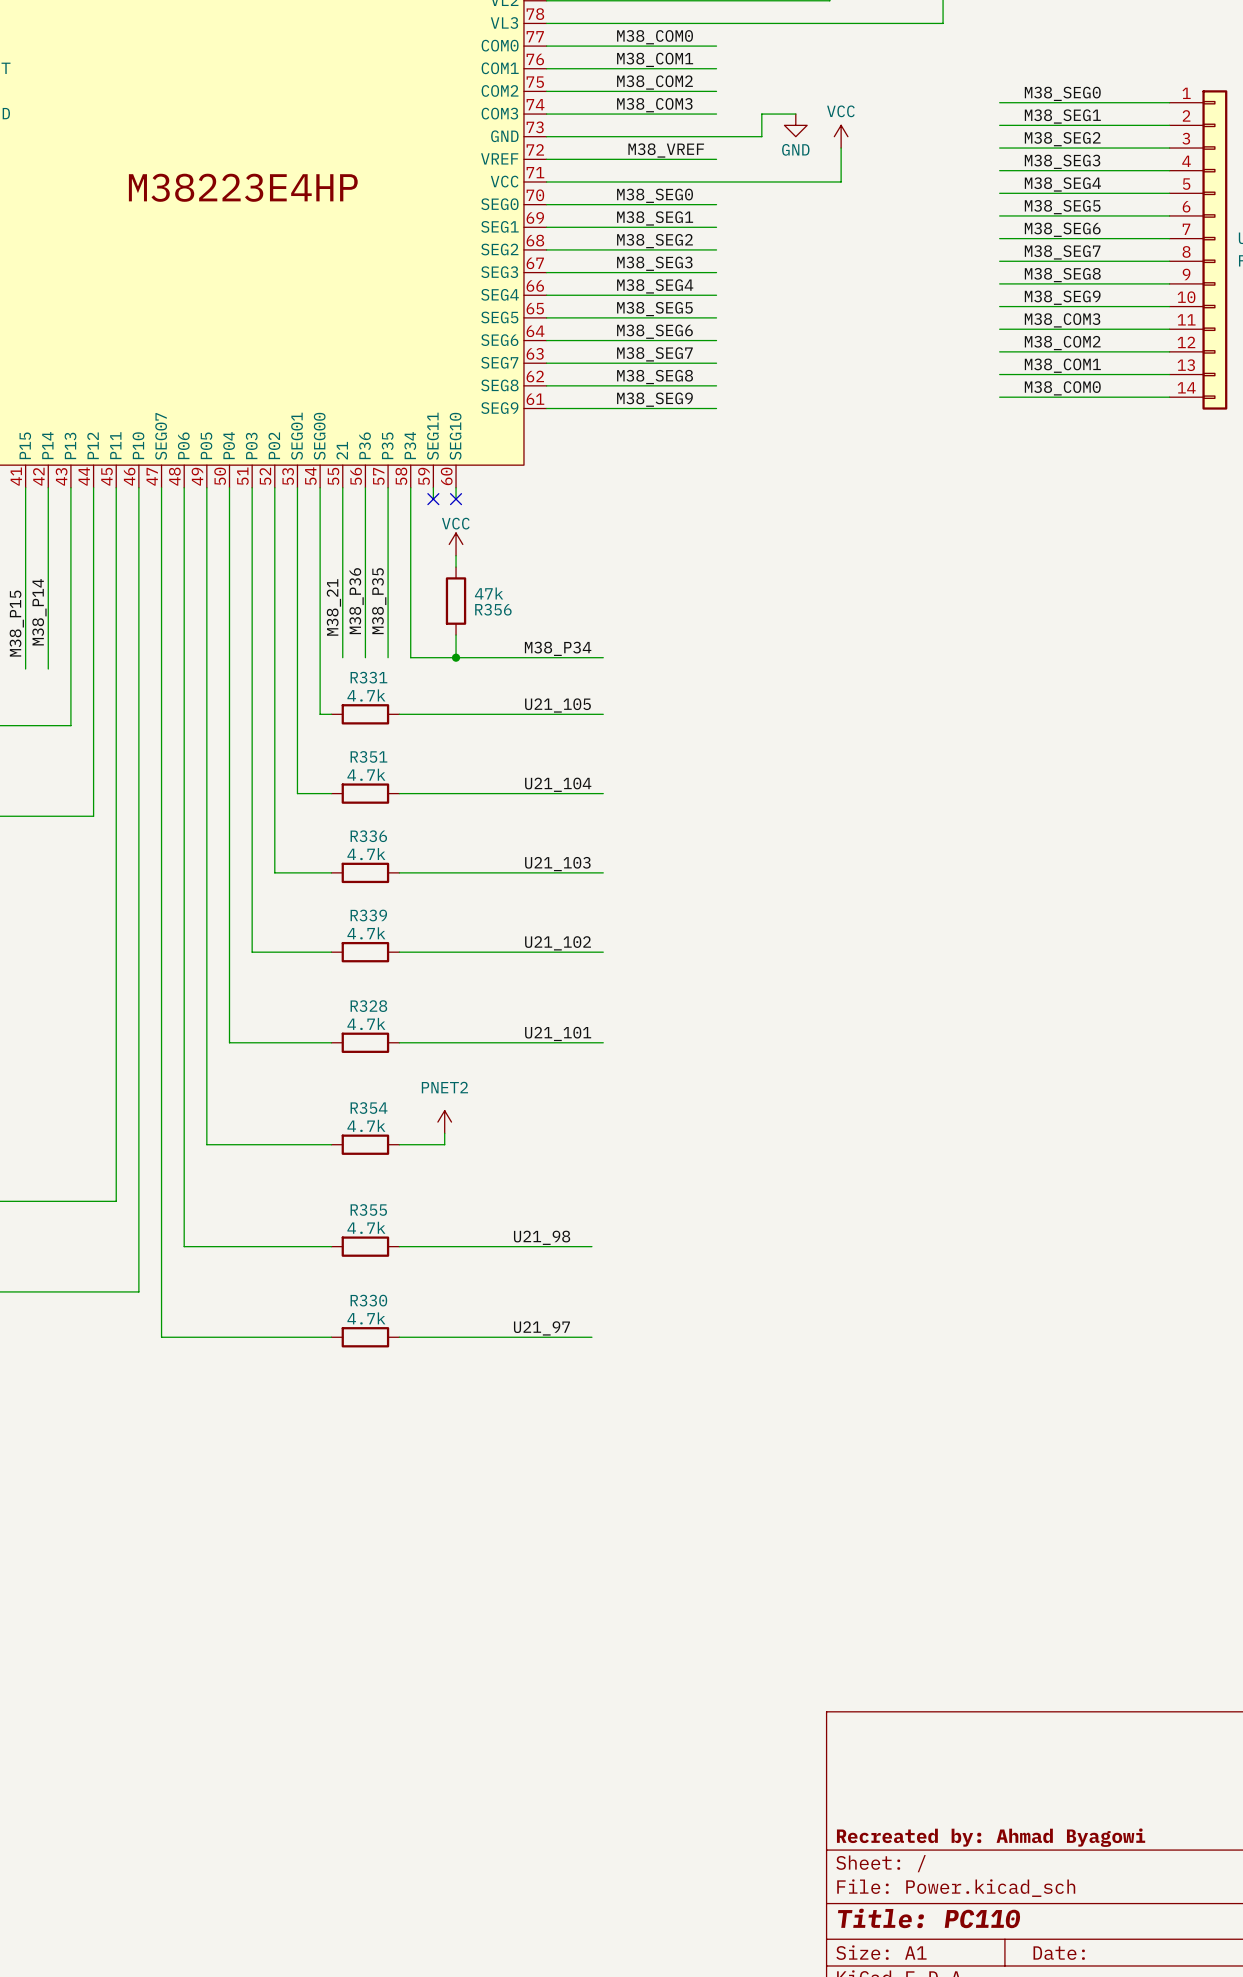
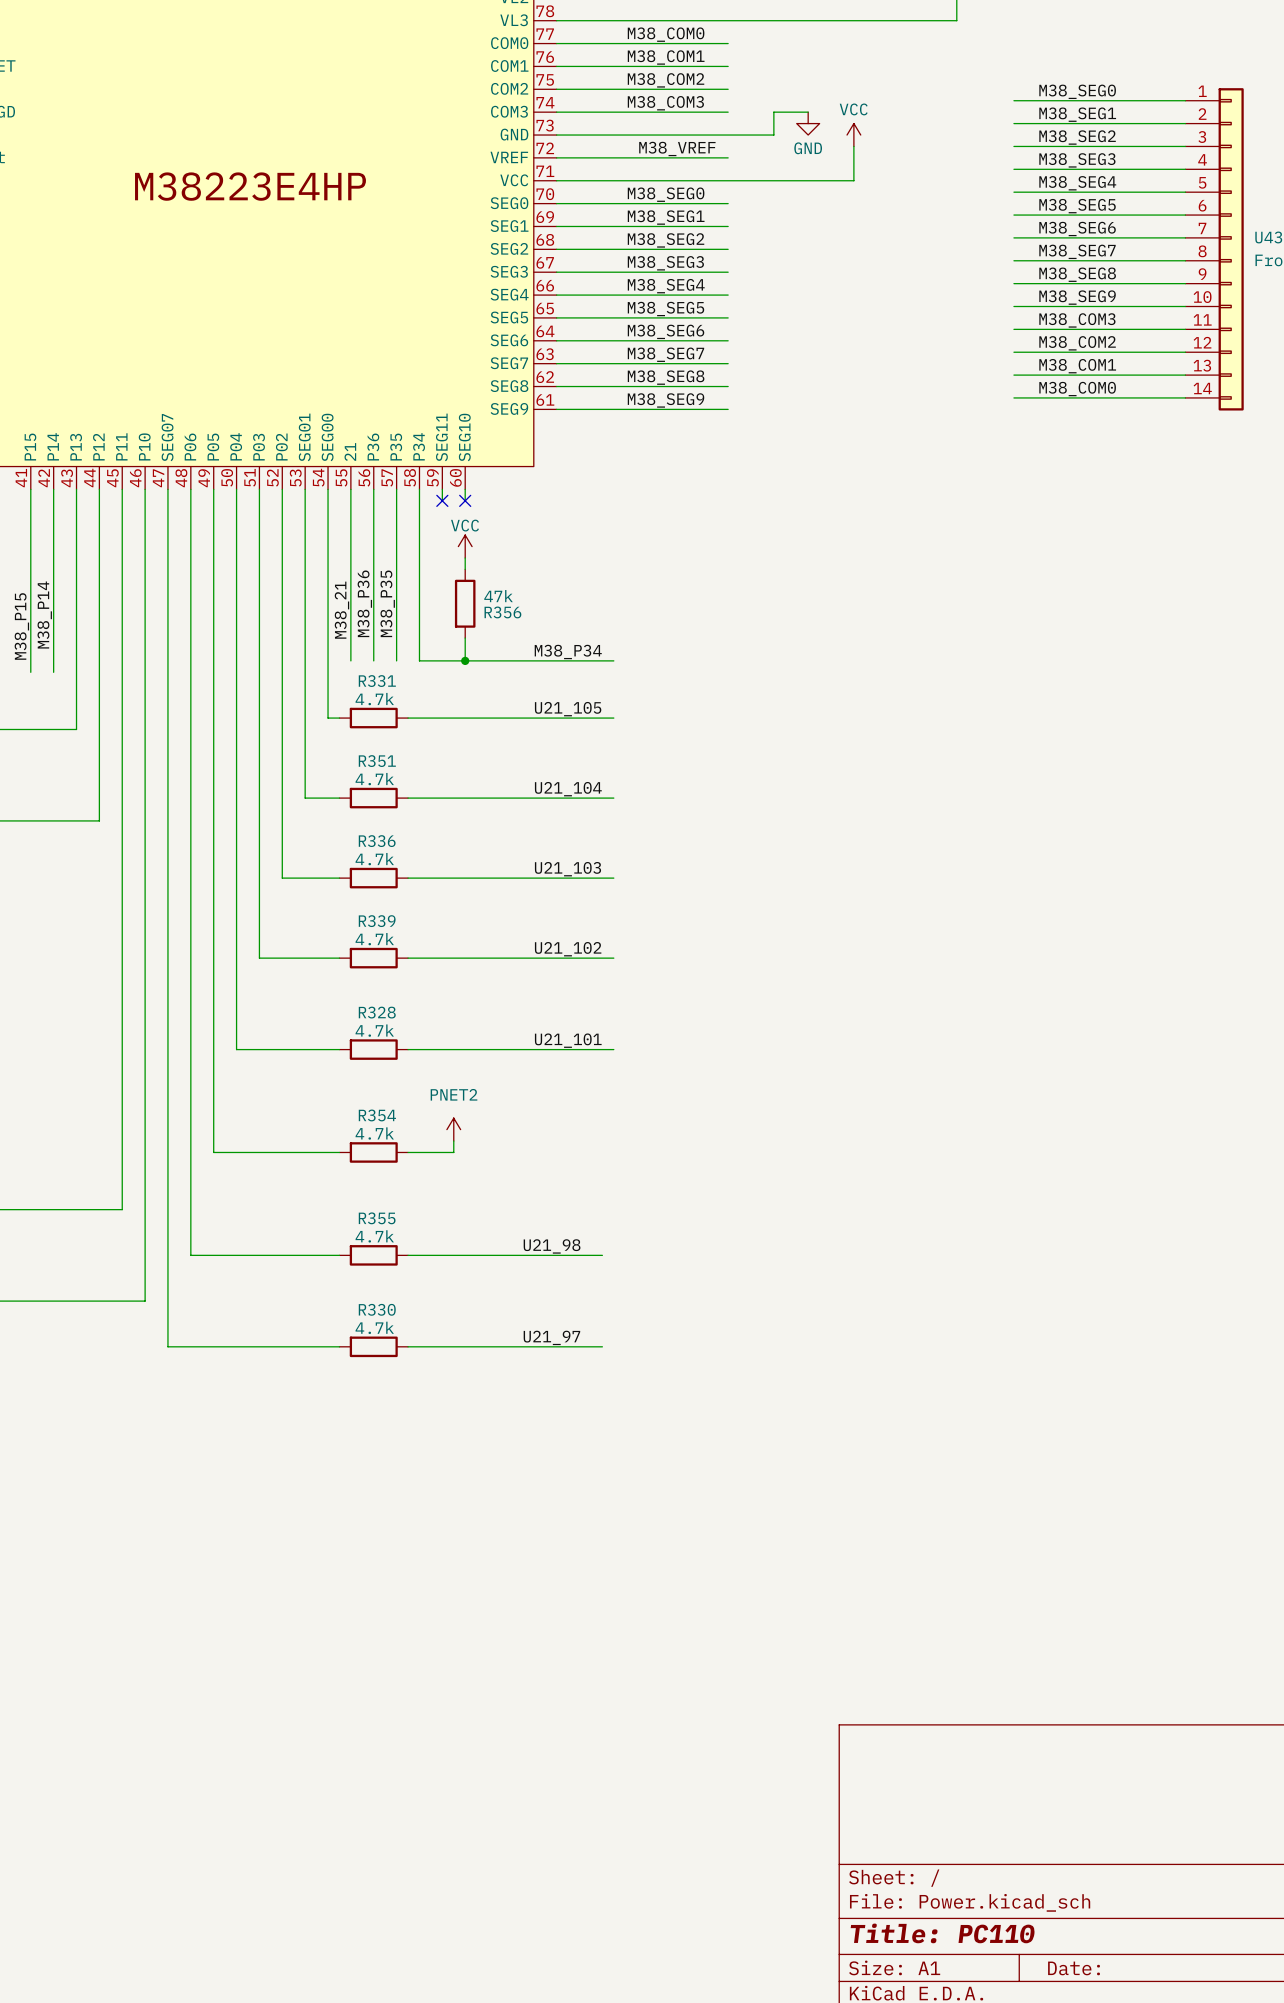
title block: Recreated by: Ahmad Byagowi (991, 1837) -> none

